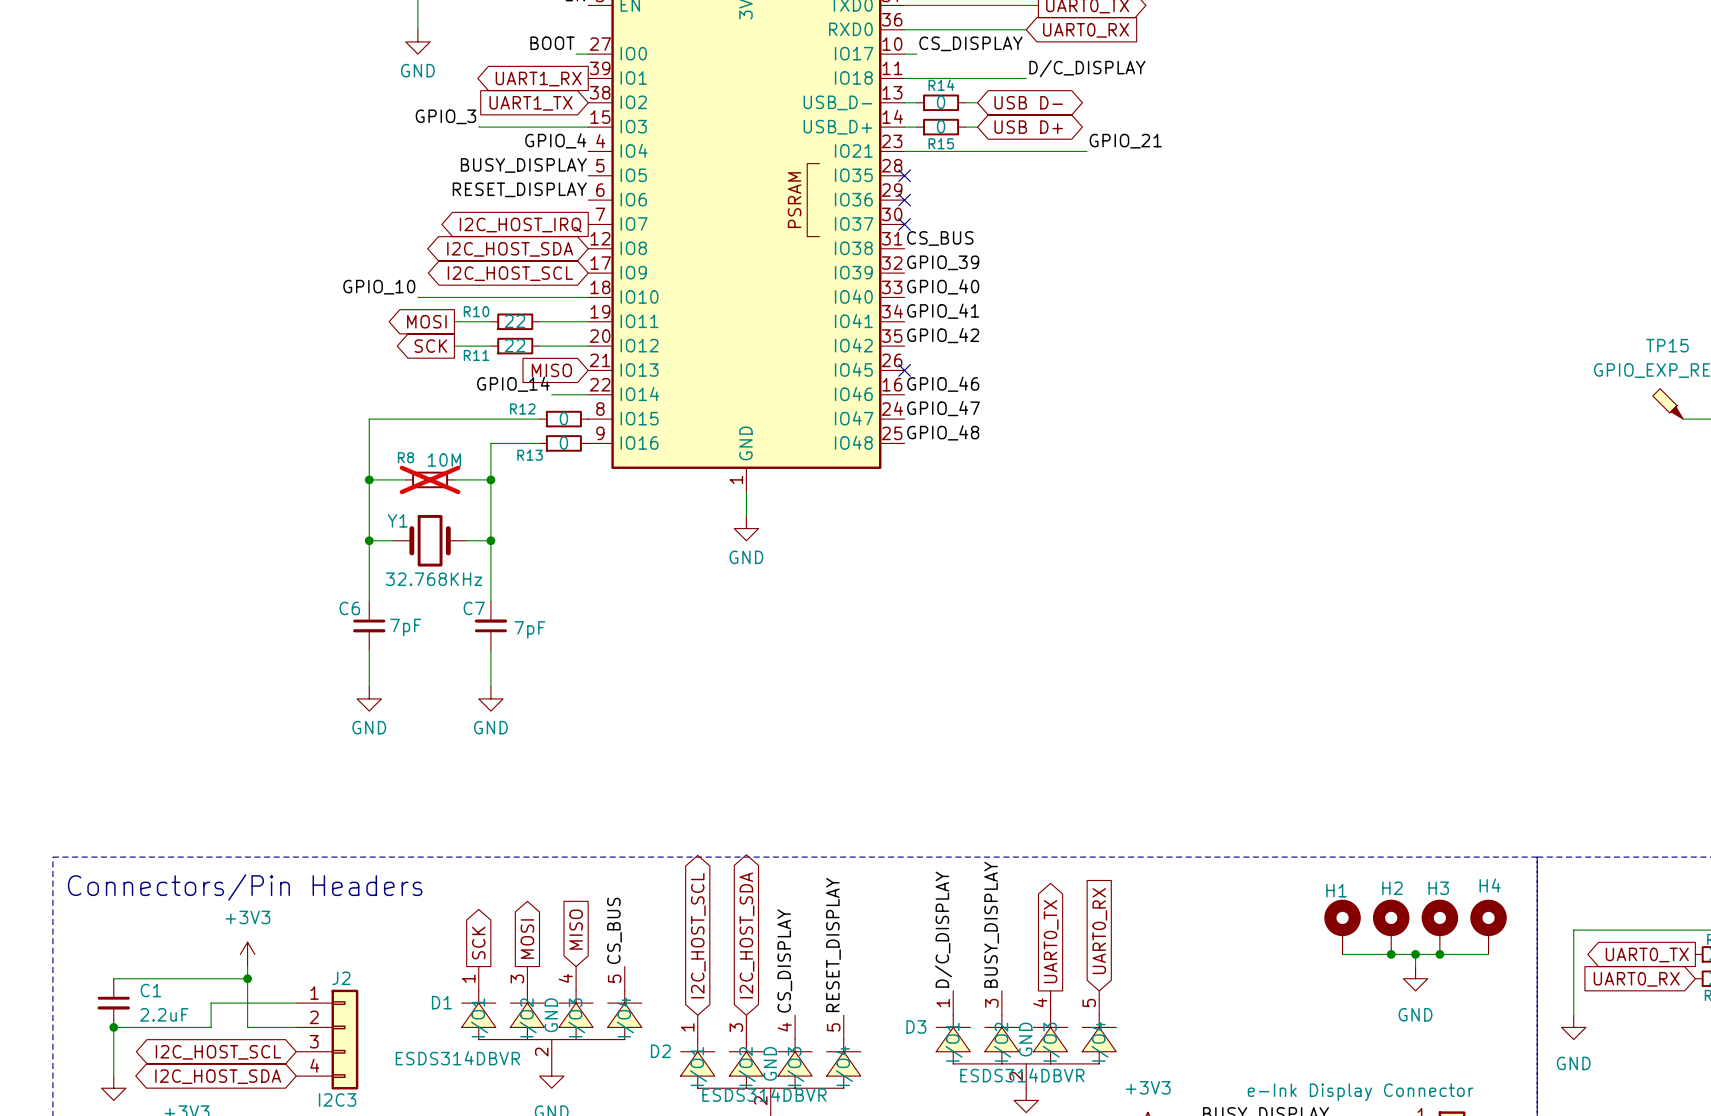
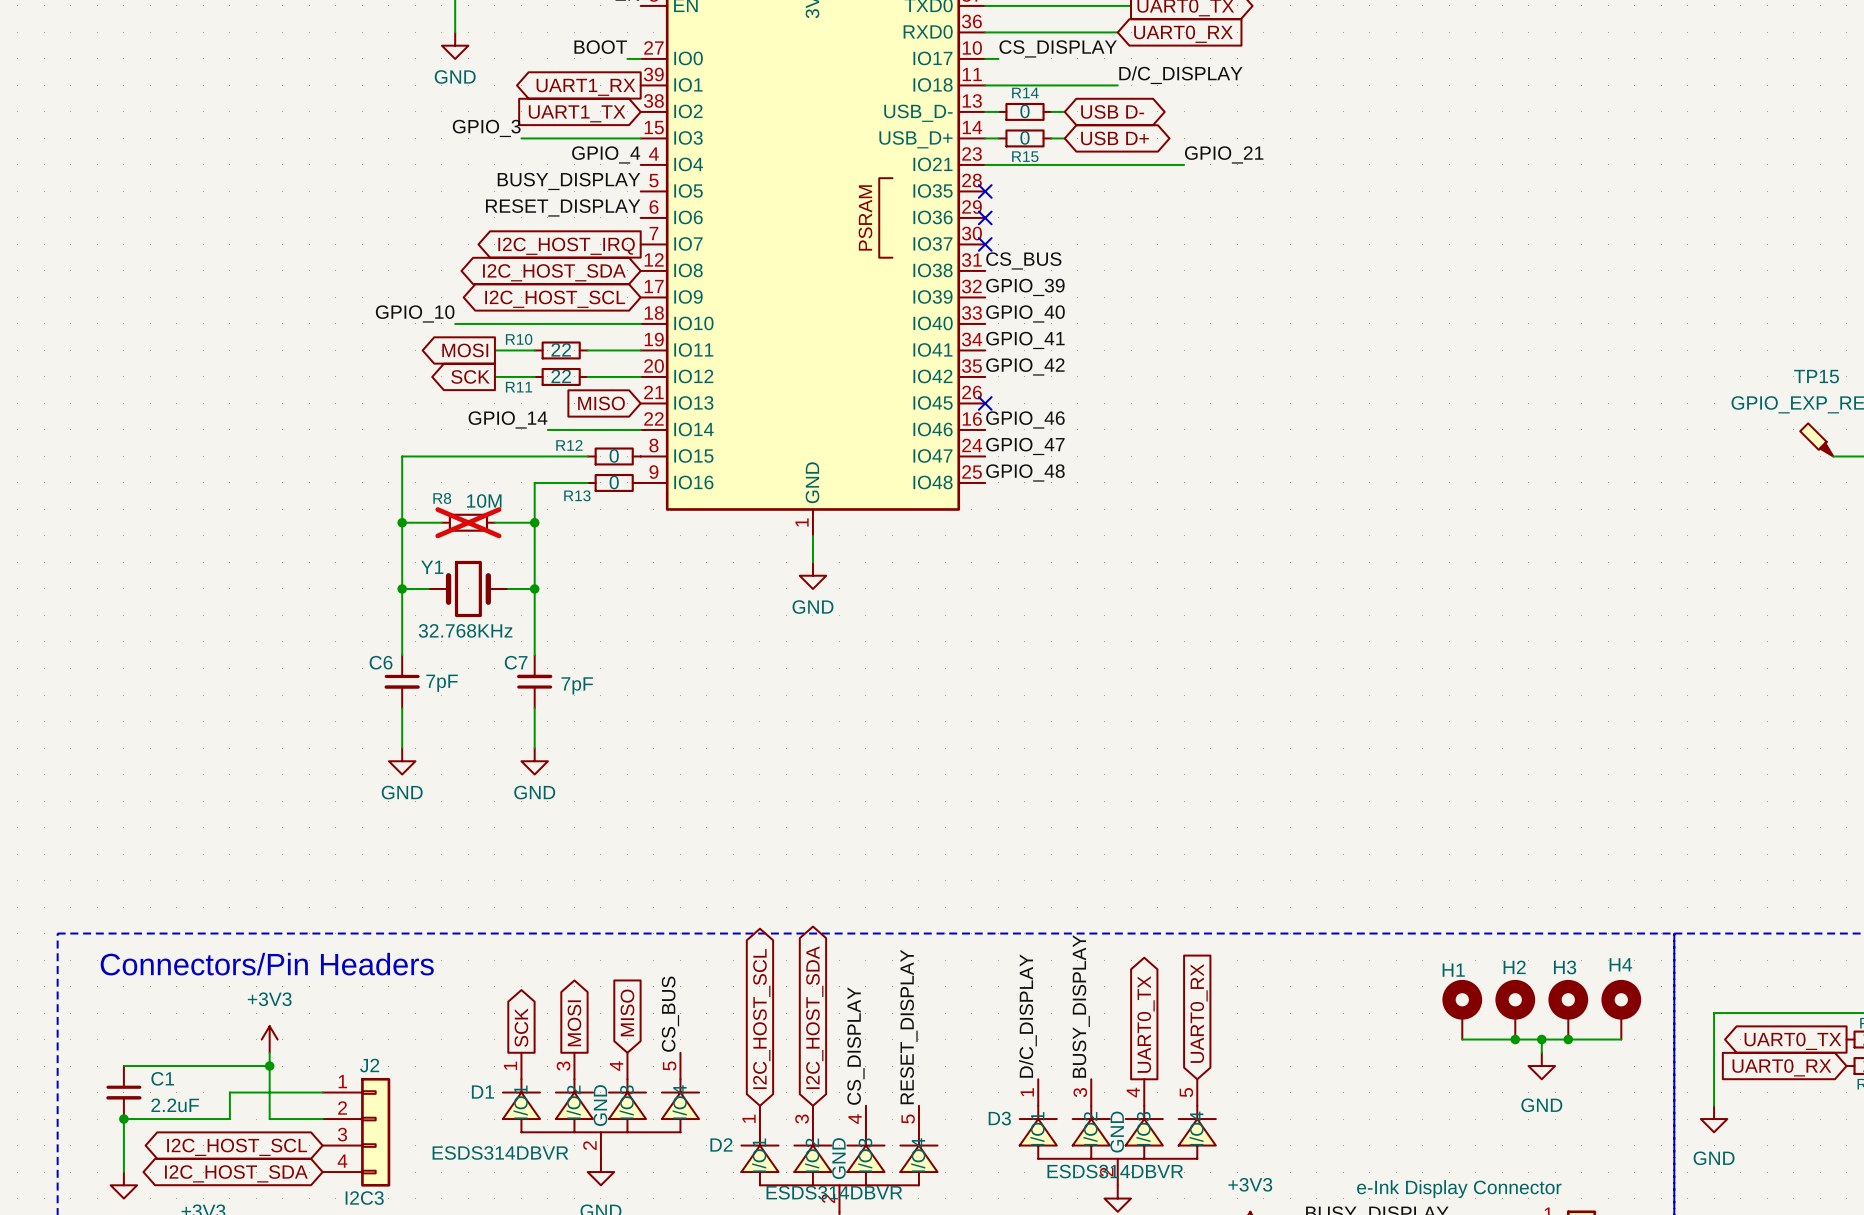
label position: GPIO_14 (513, 384) -> GPIO_14 (508, 419)
wire: none -> (547, 429) (600, 429)

